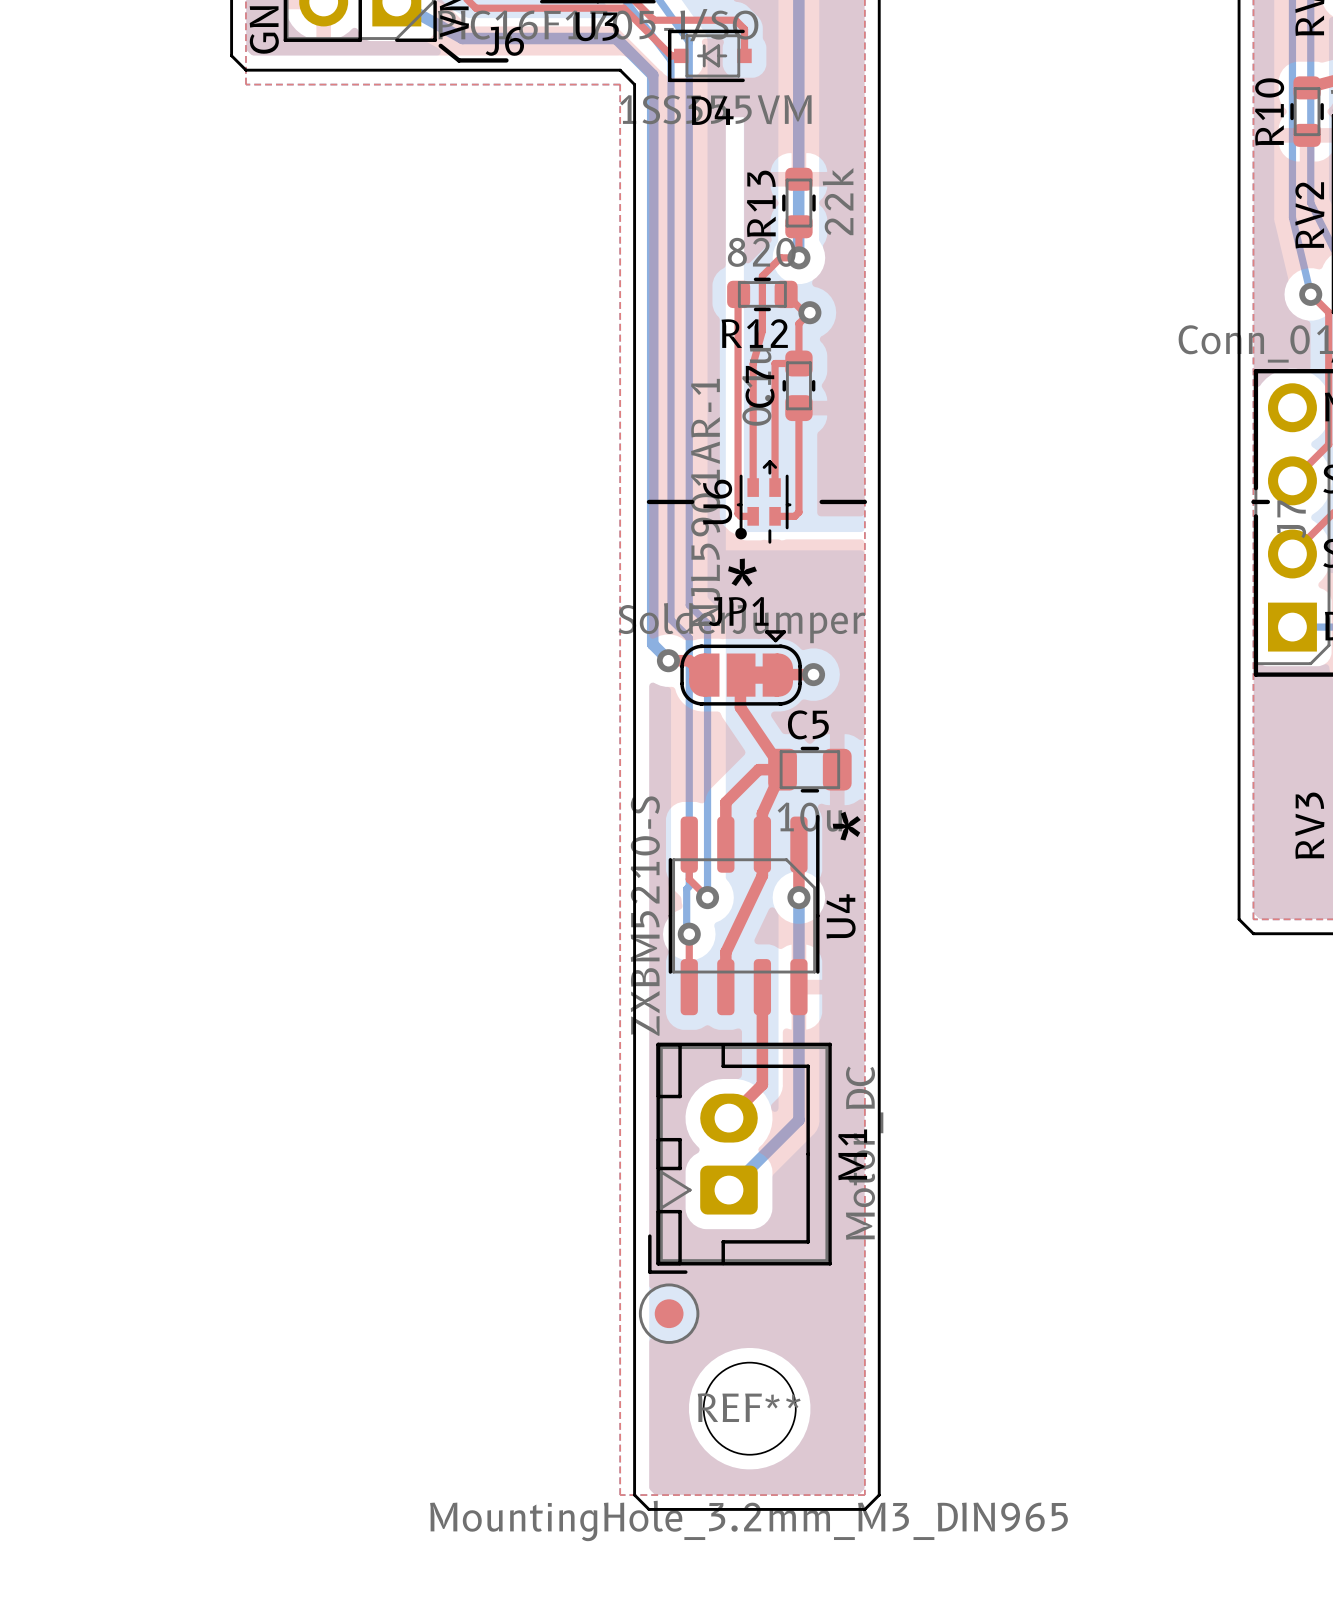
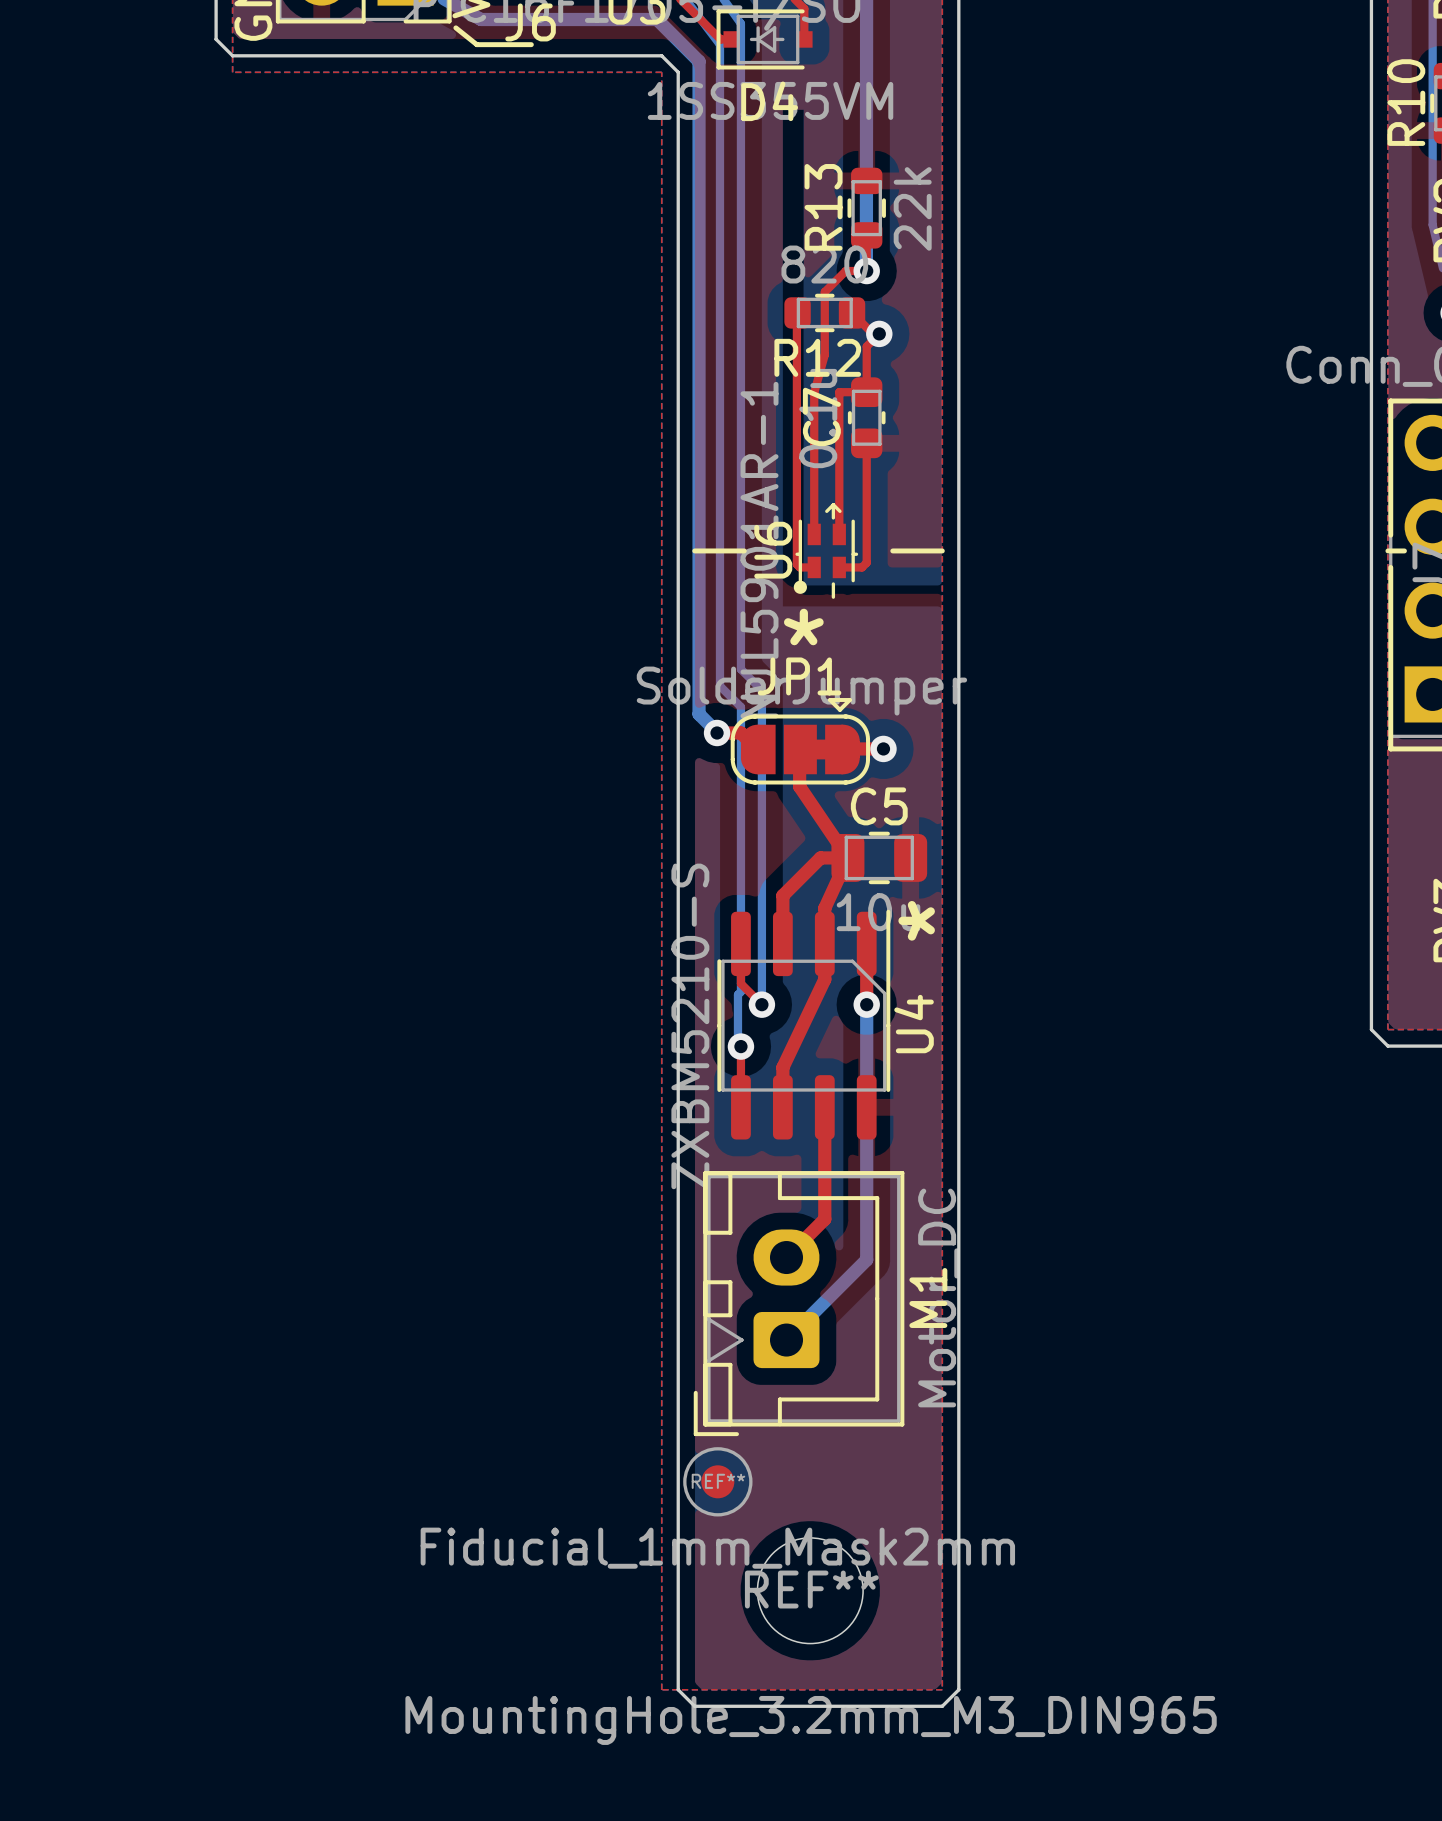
REF** name: none -> REF** (718, 1481)
REF** value: none -> Fiducial_1mm_Mask2mm (717, 1548)

